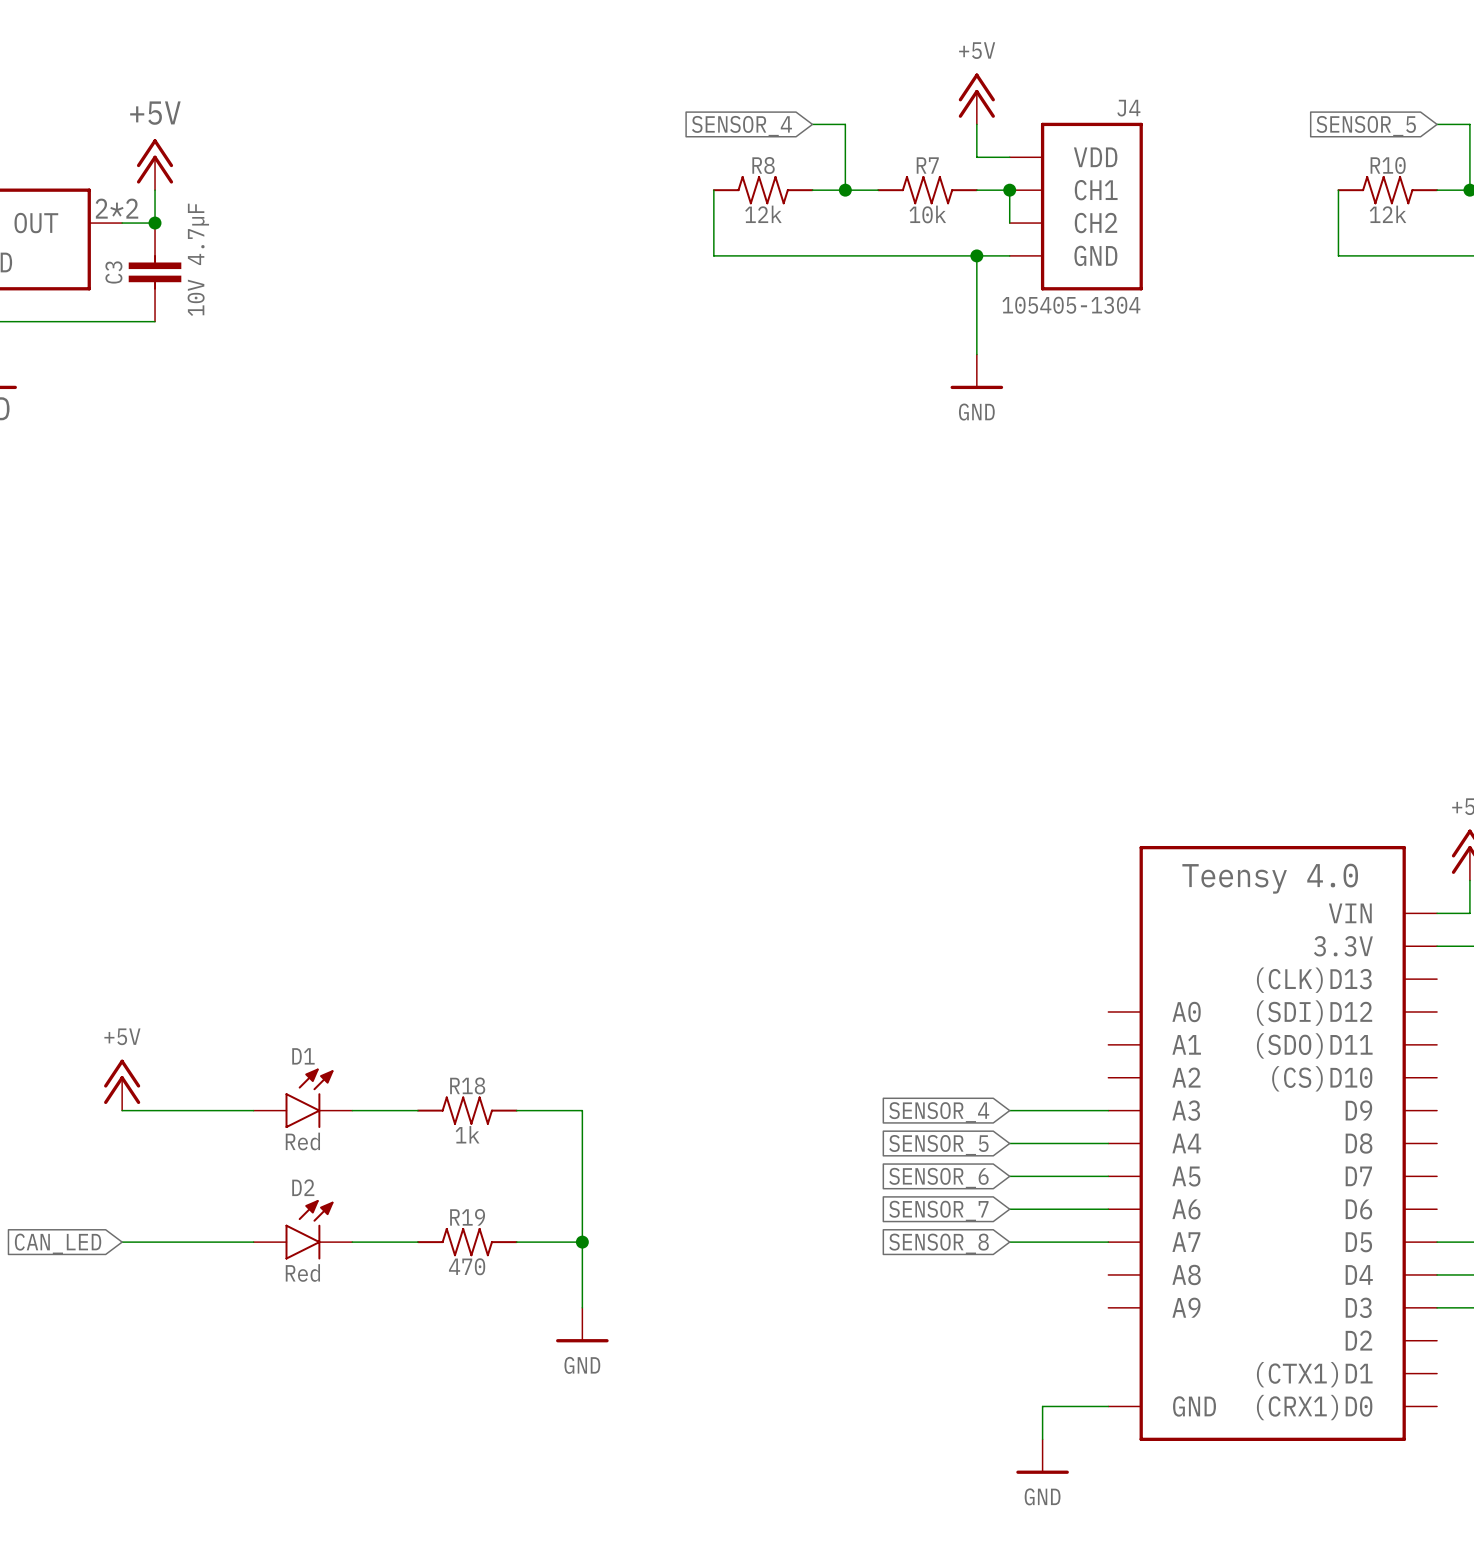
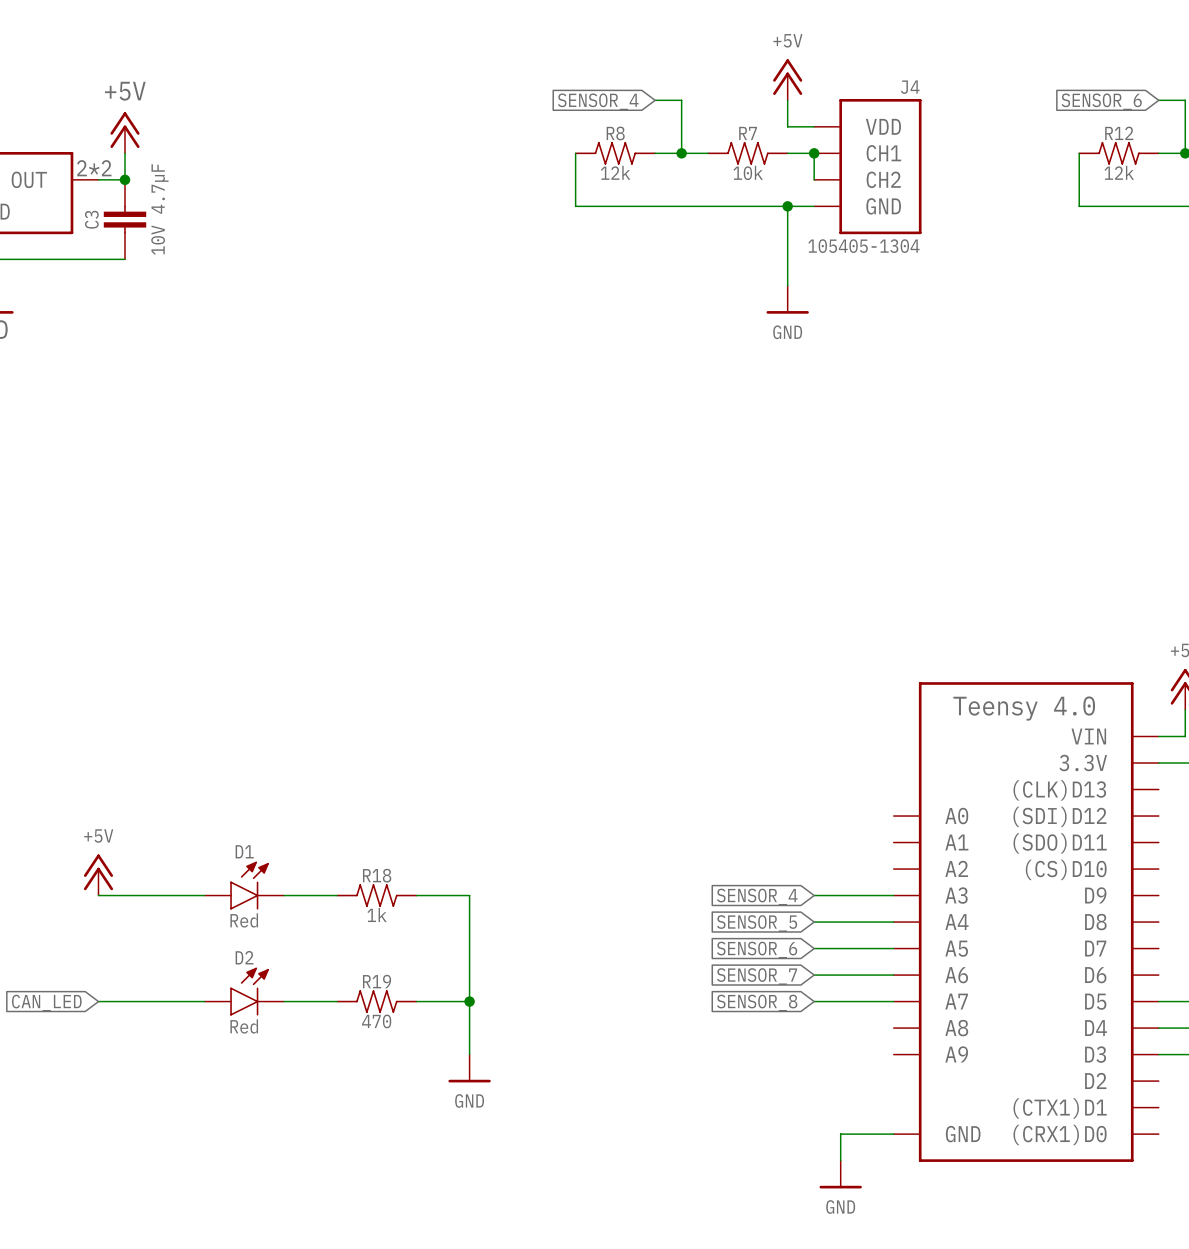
global label: SENSOR_5 (1366, 126) -> SENSOR_6 (1101, 101)
R10 name: R10 (1388, 165) -> R12 (1119, 133)

